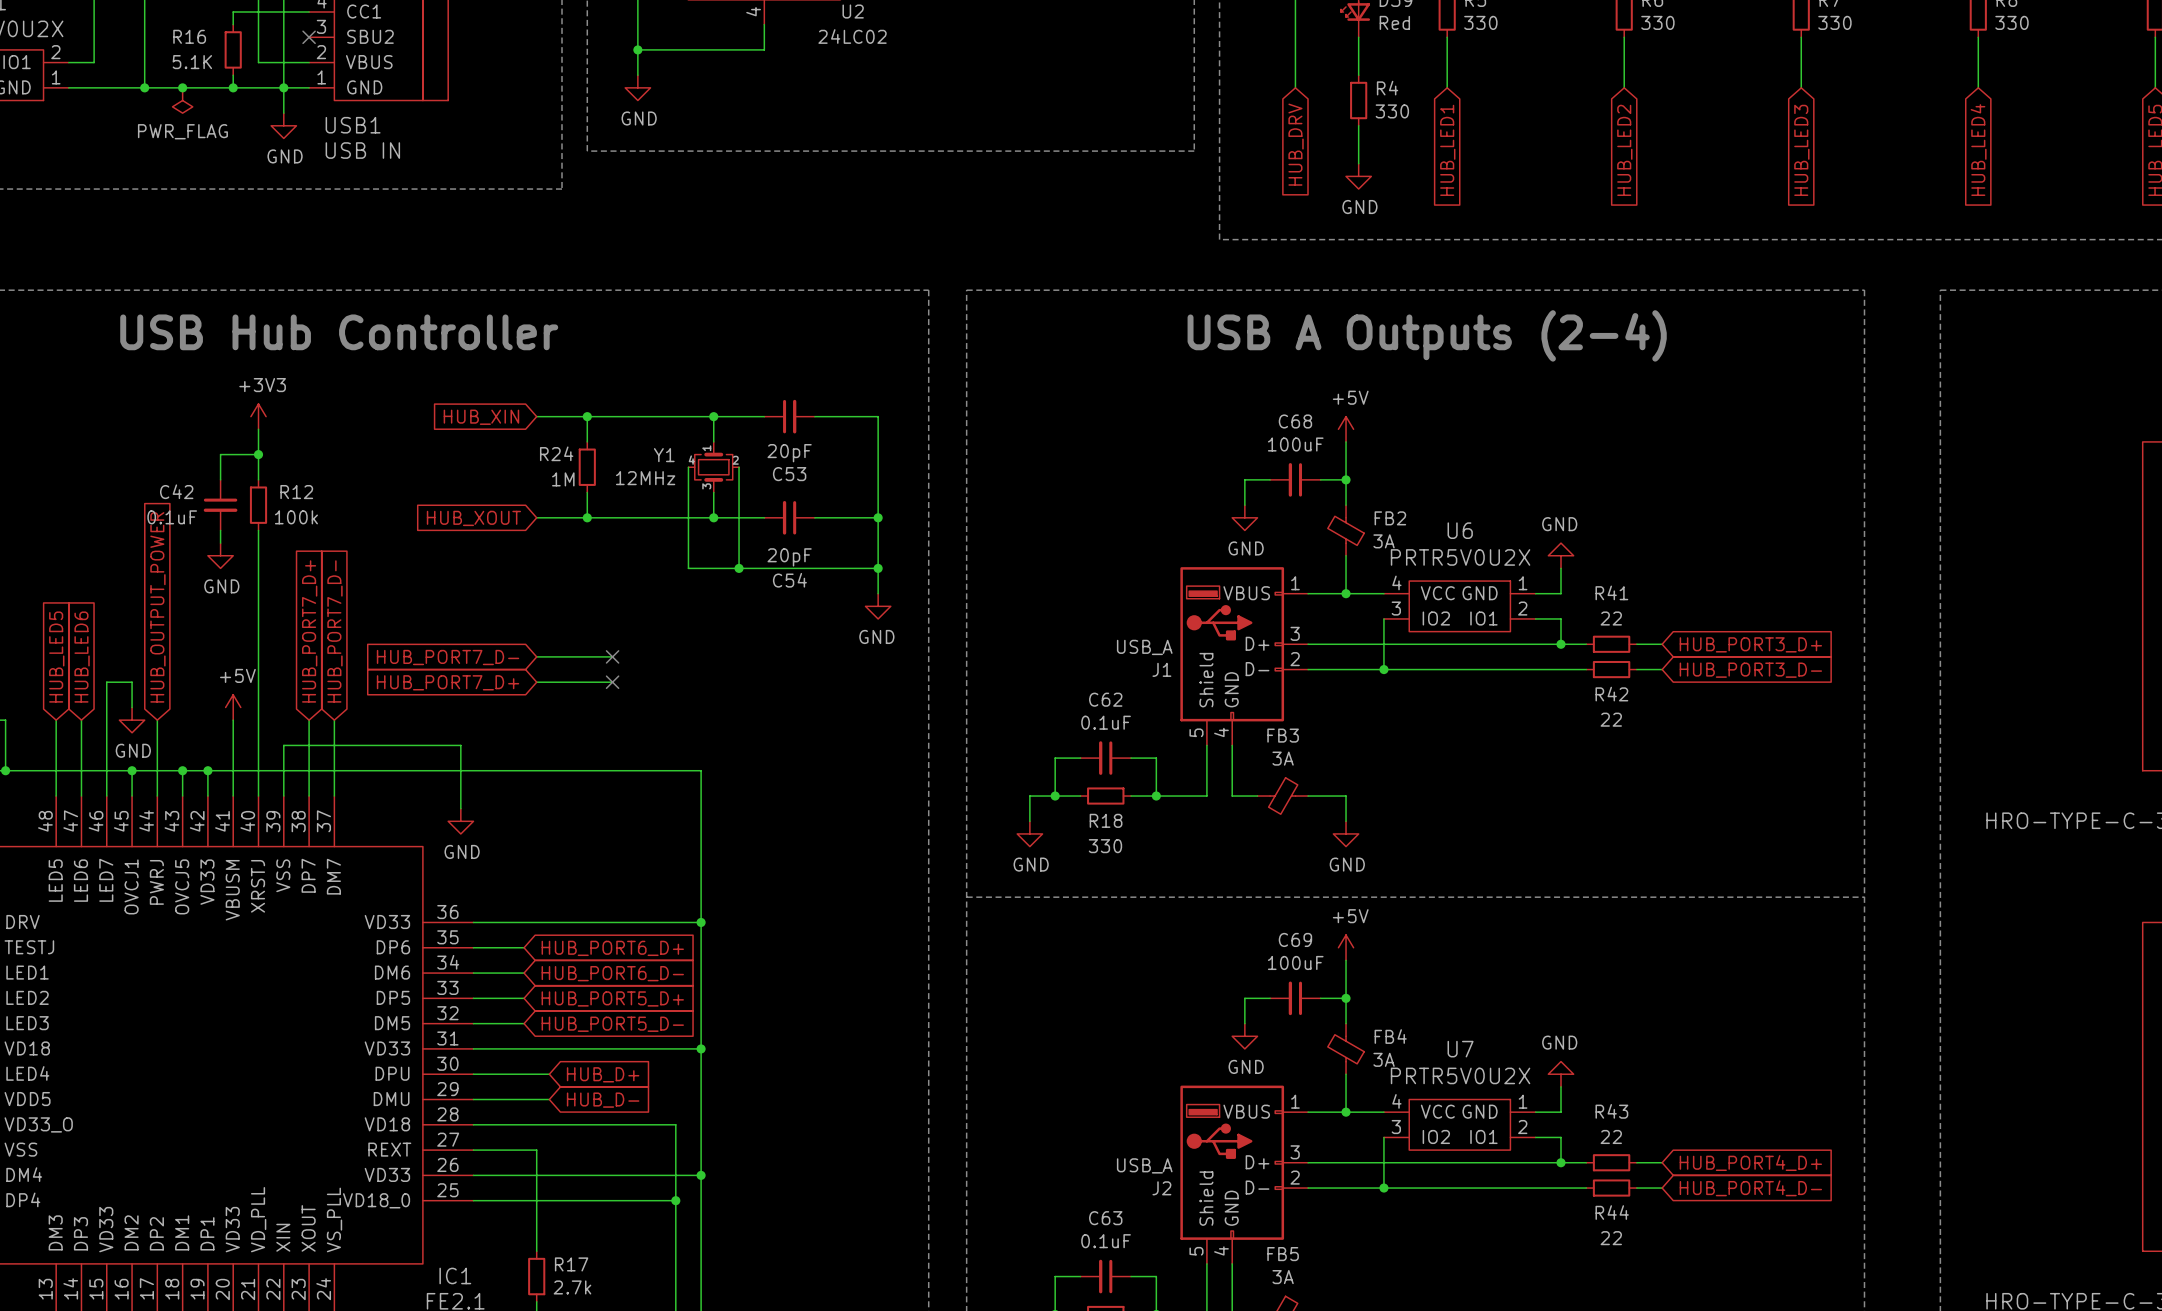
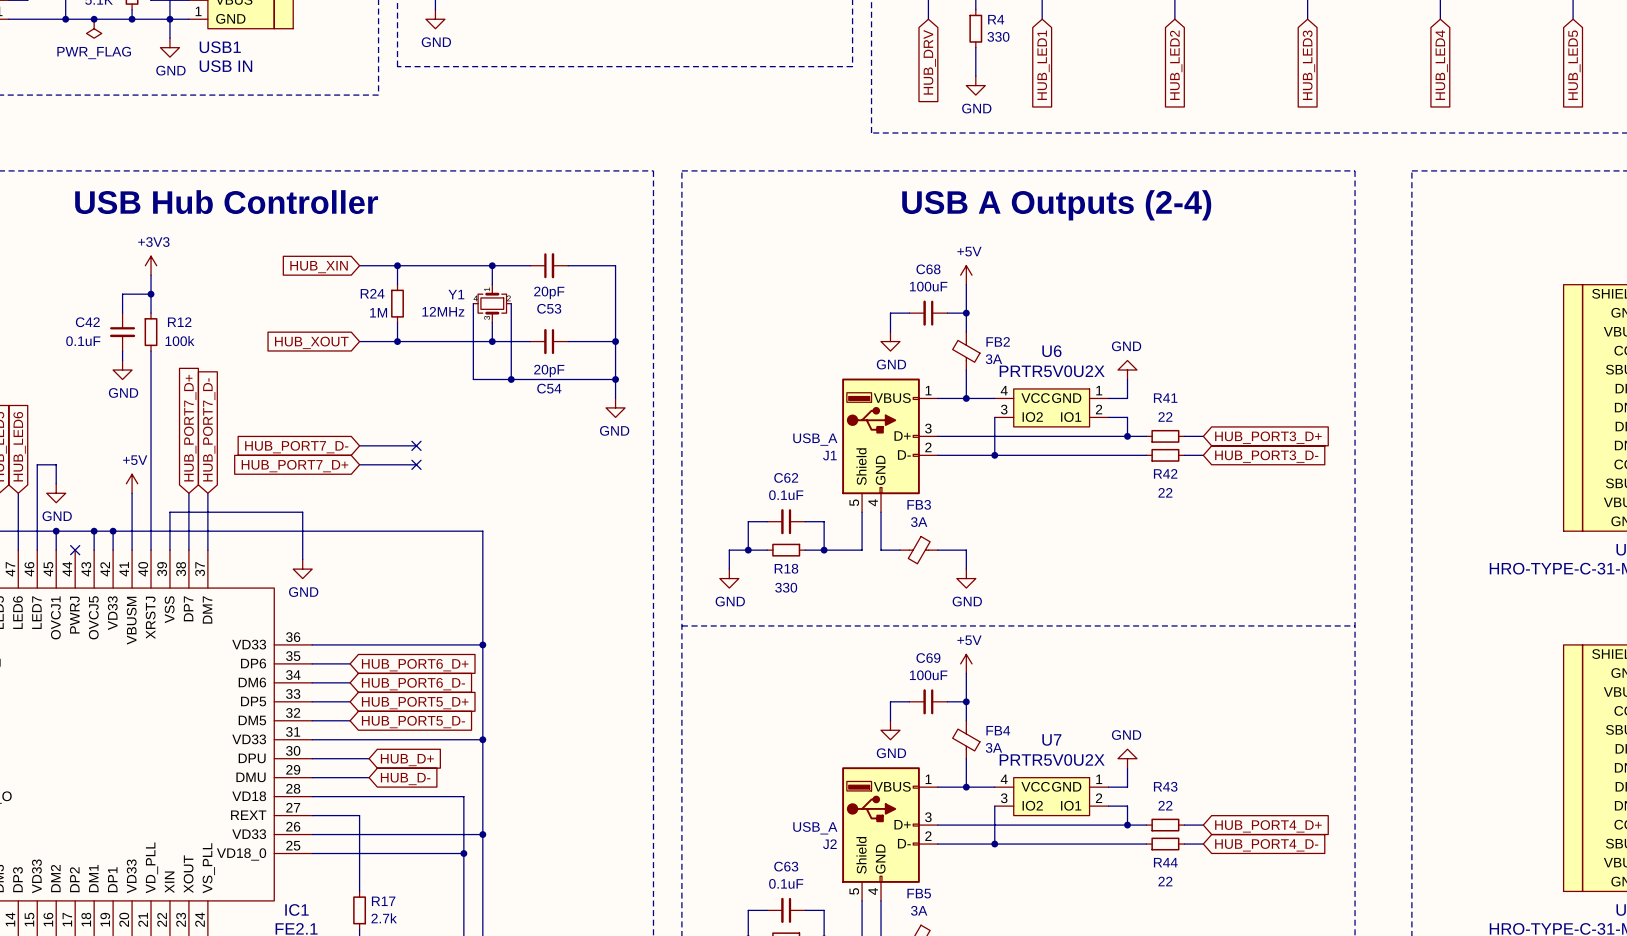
global label: HUB_OUTPUT_POWER (157, 607) -> none
wire: (157, 720) (157, 796) -> none
no-connect mark: none -> (75, 550)

